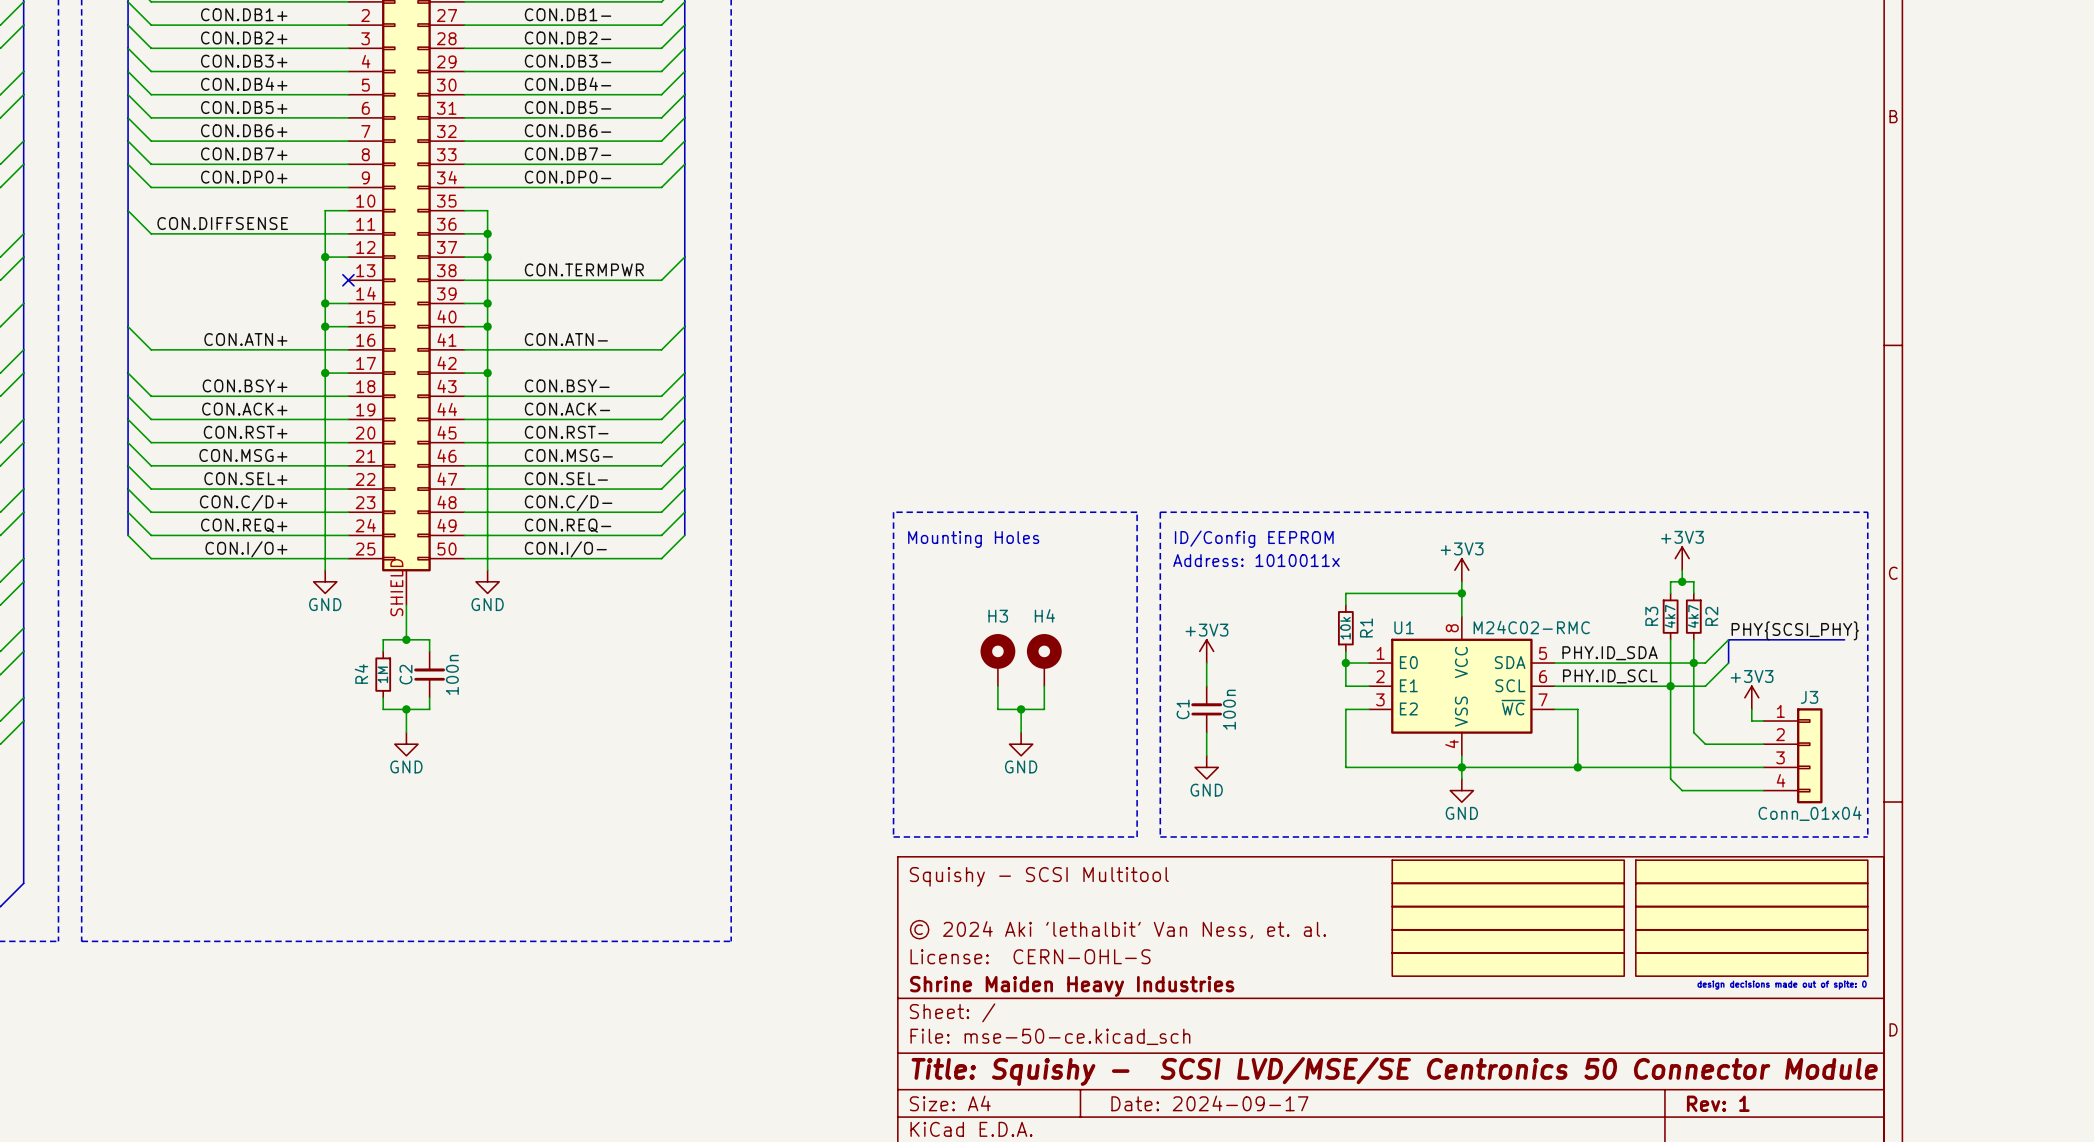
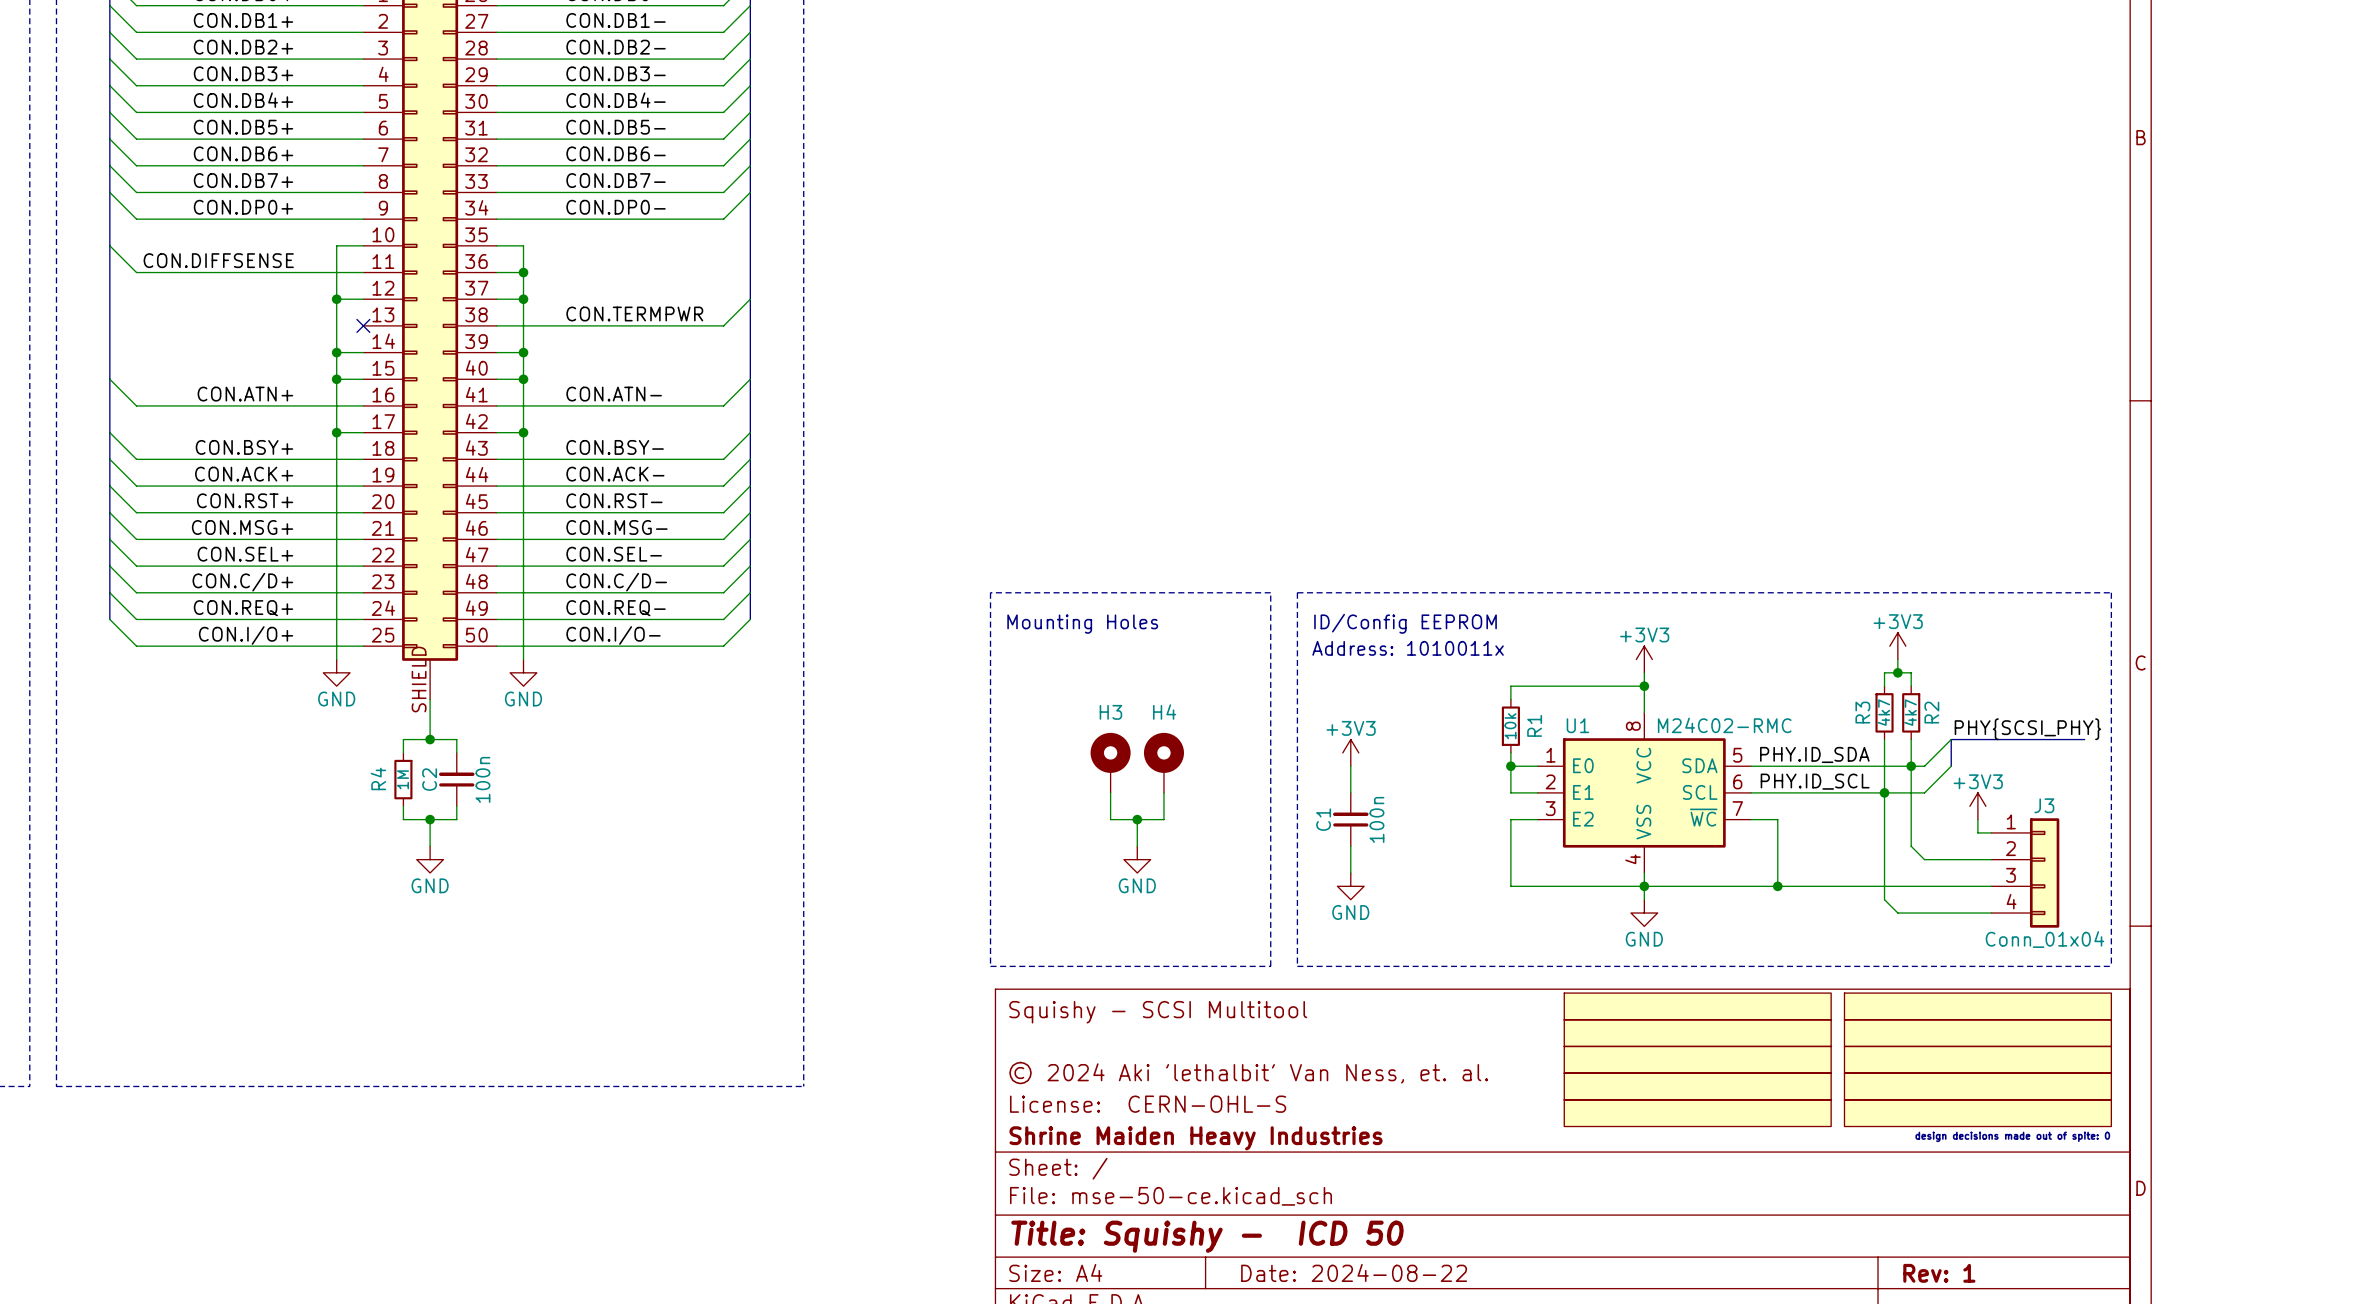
title block: Title: Squishy - SCSI LVD/MSE/SE Centronics 50 Connector Module (1394, 1071) -> Title: Squishy - ICD 50 (1207, 1236)
title block: Date: 2024-09-17 (1209, 1103) -> Date: 2024-08-22 (1354, 1272)

